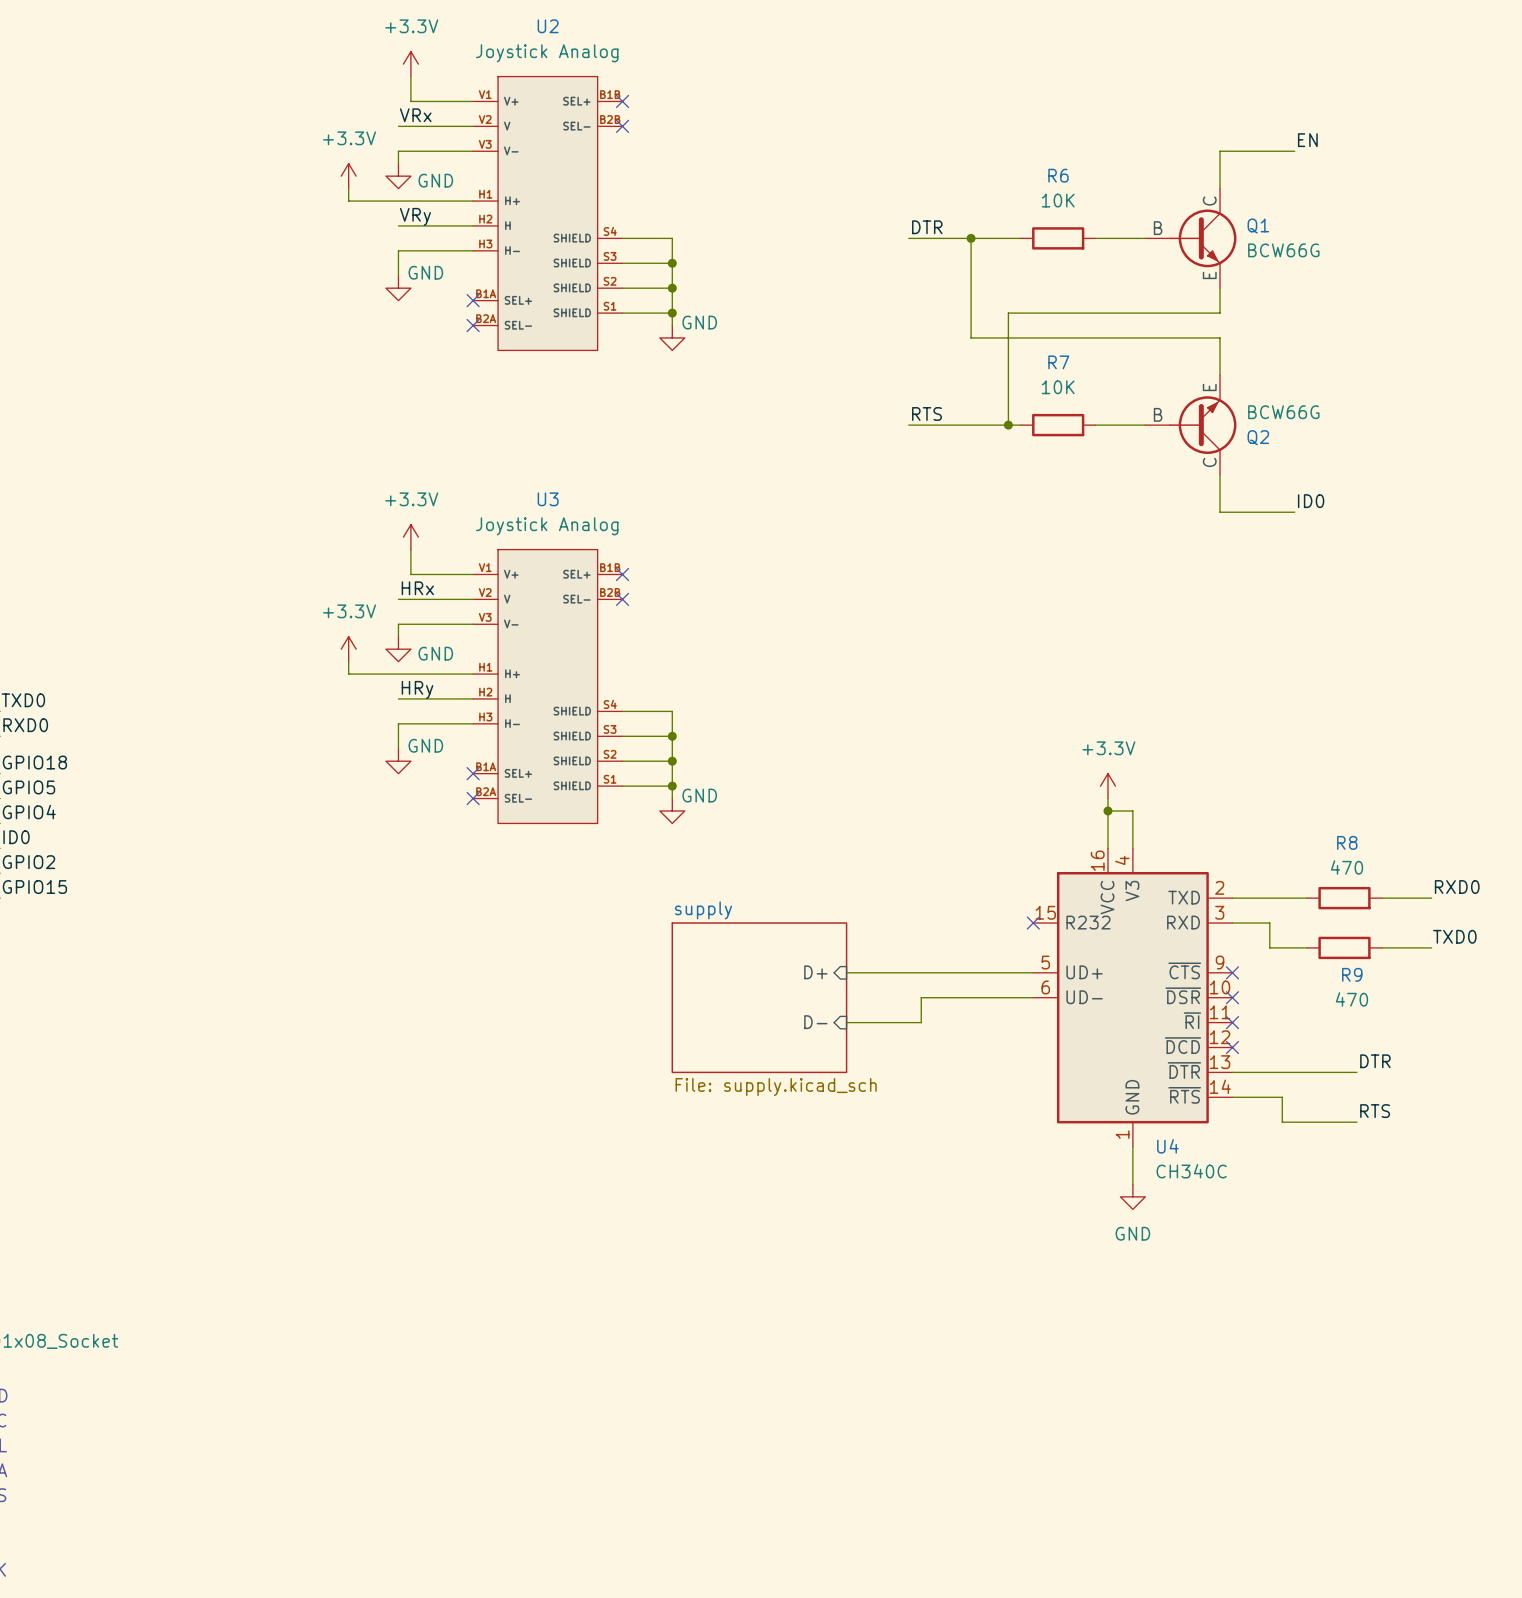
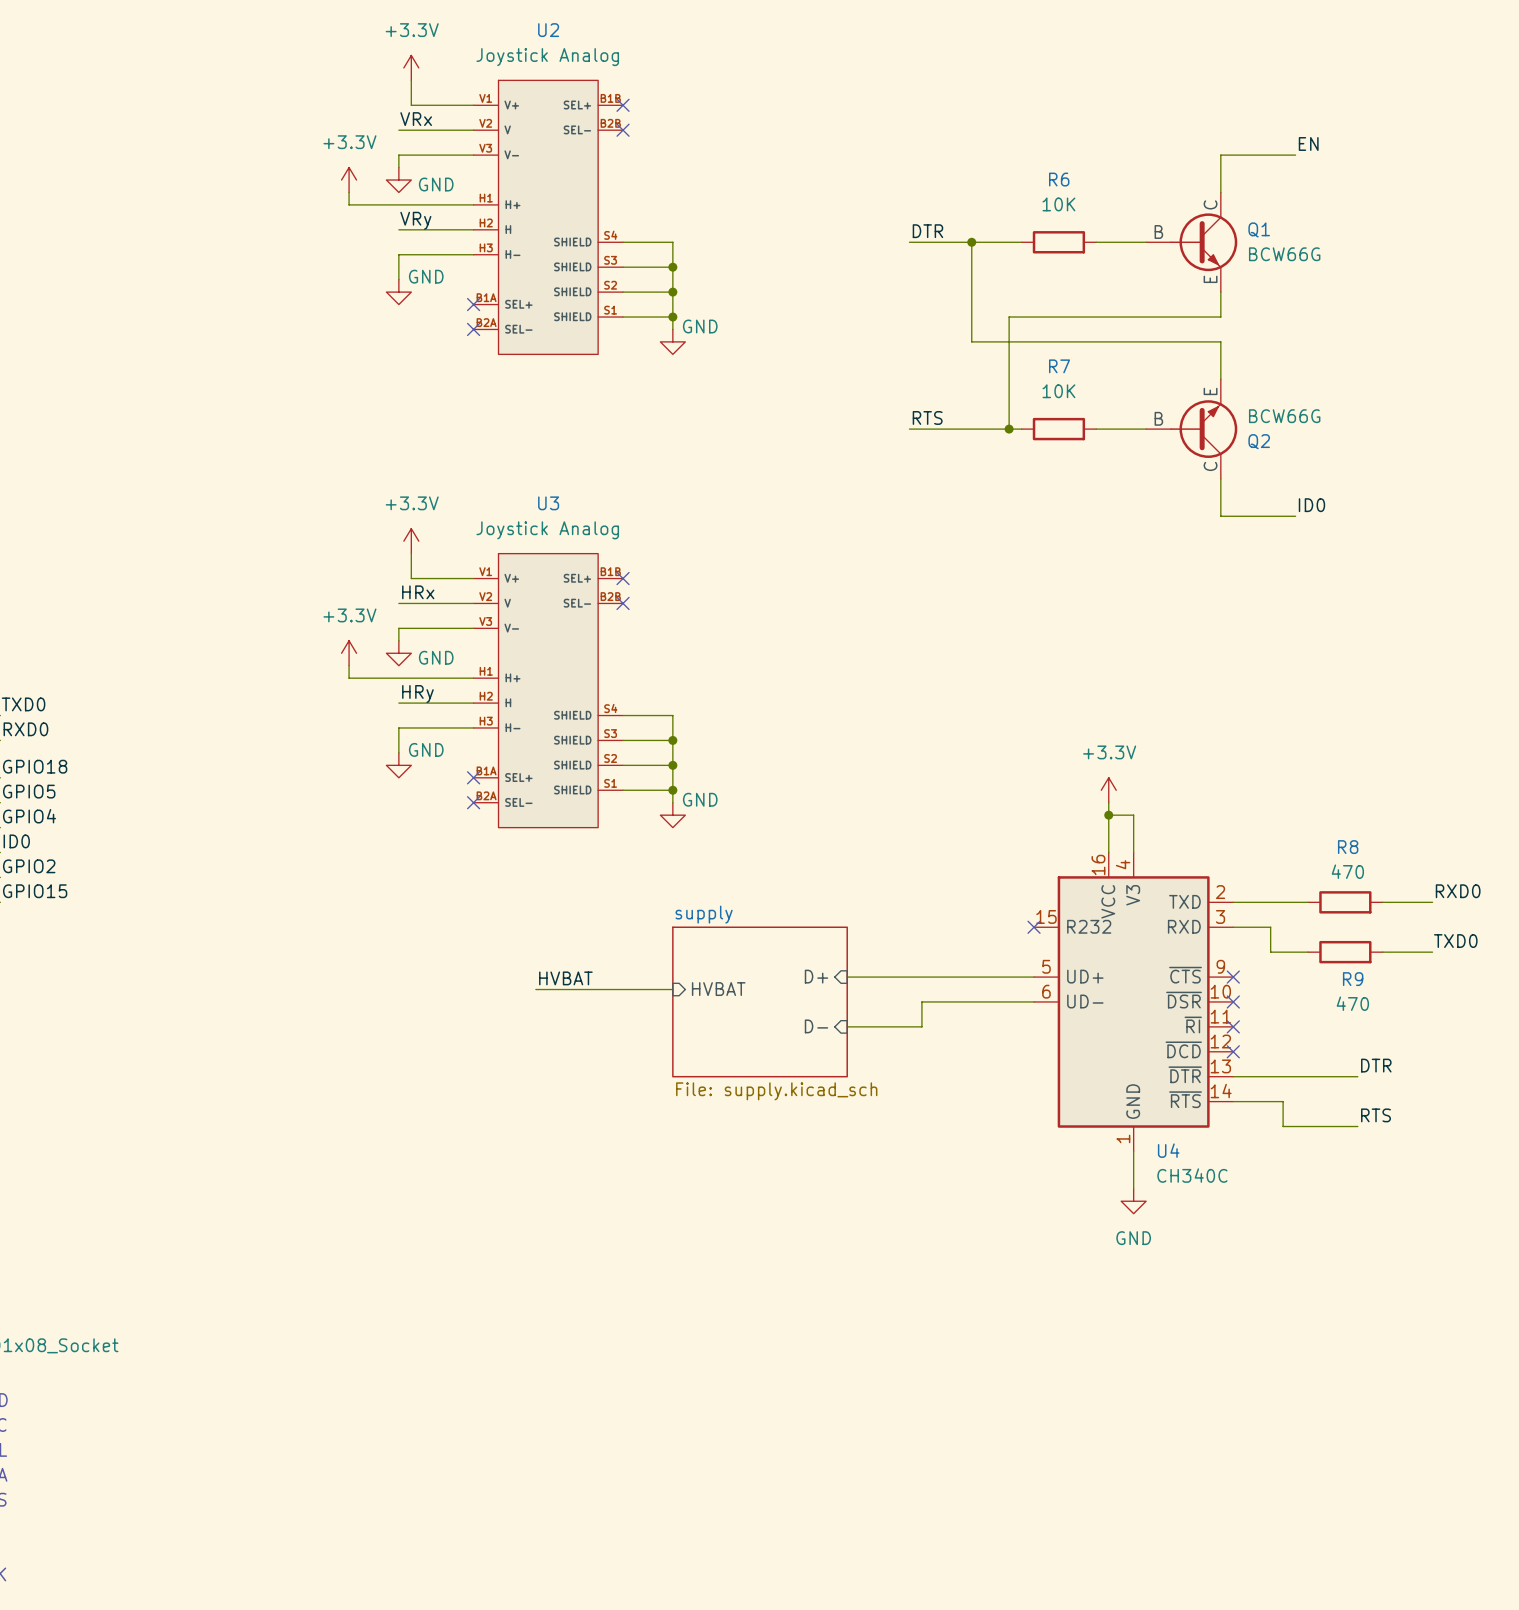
label: none -> HVBAT (565, 978)
sheet pin: none -> HVBAT (718, 989)
wire: none -> (535, 989) (672, 989)

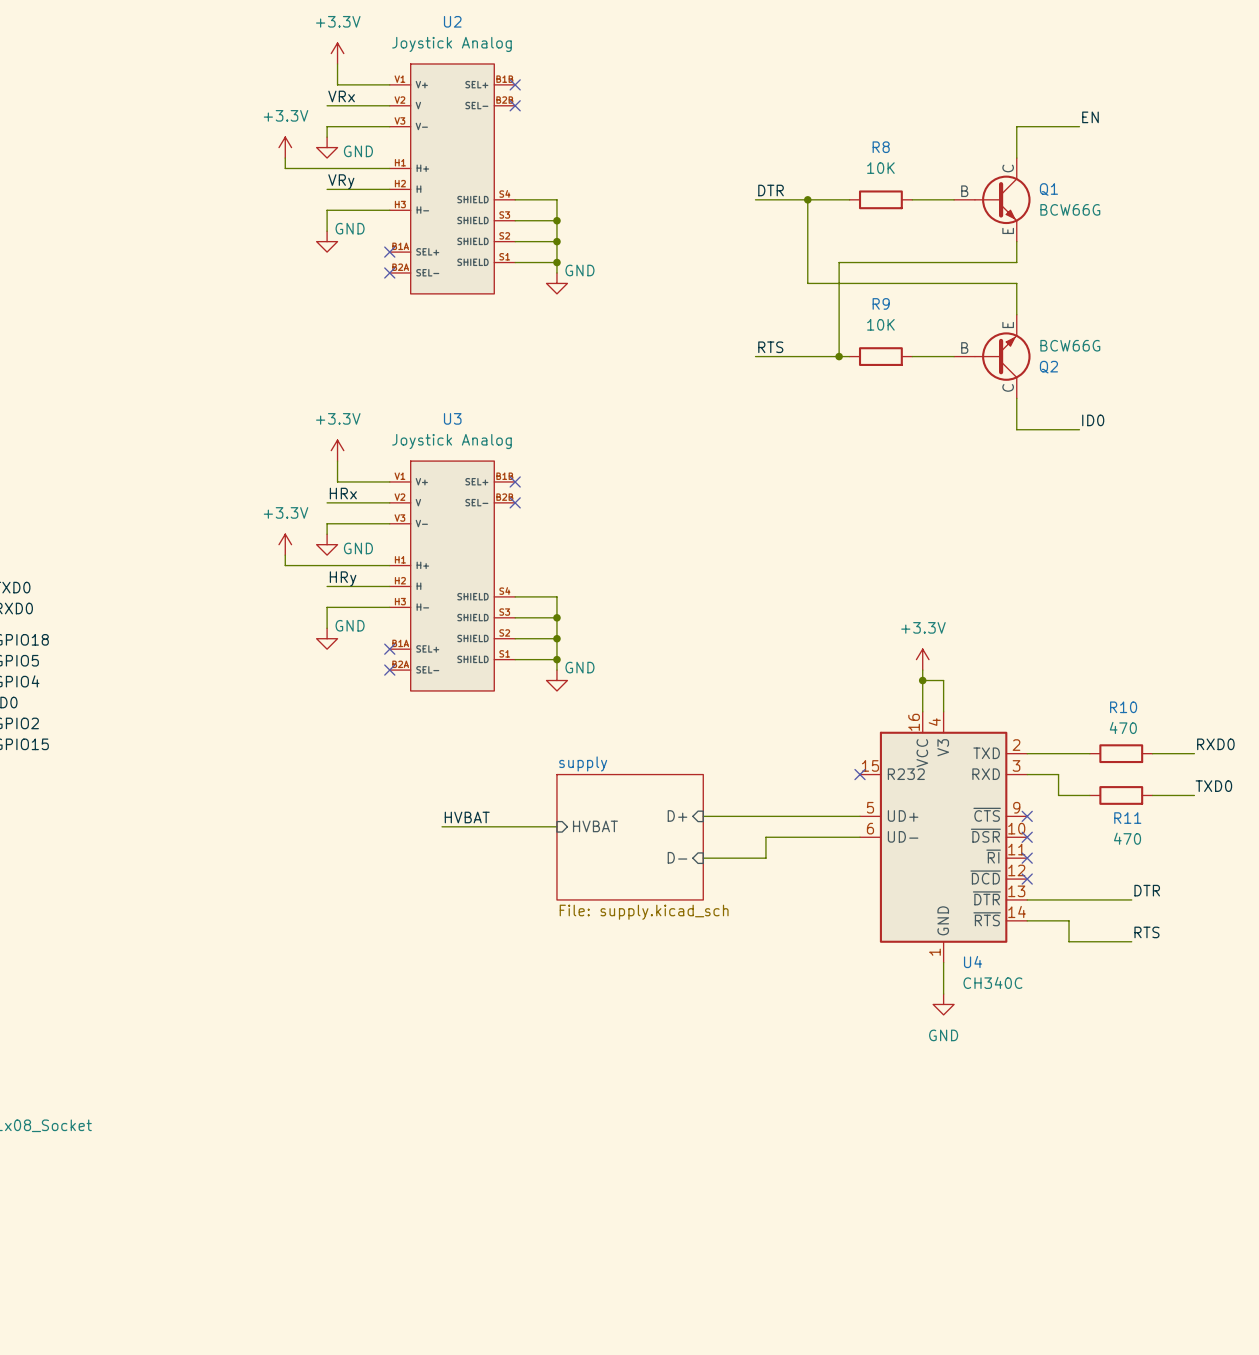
R6 name: R6 (1059, 179) -> R8 (881, 147)
R7 name: R7 (1059, 366) -> R9 (881, 303)
R8 name: R8 (1348, 847) -> R10 (1123, 707)
R9 name: R9 (1353, 979) -> R11 (1127, 818)

